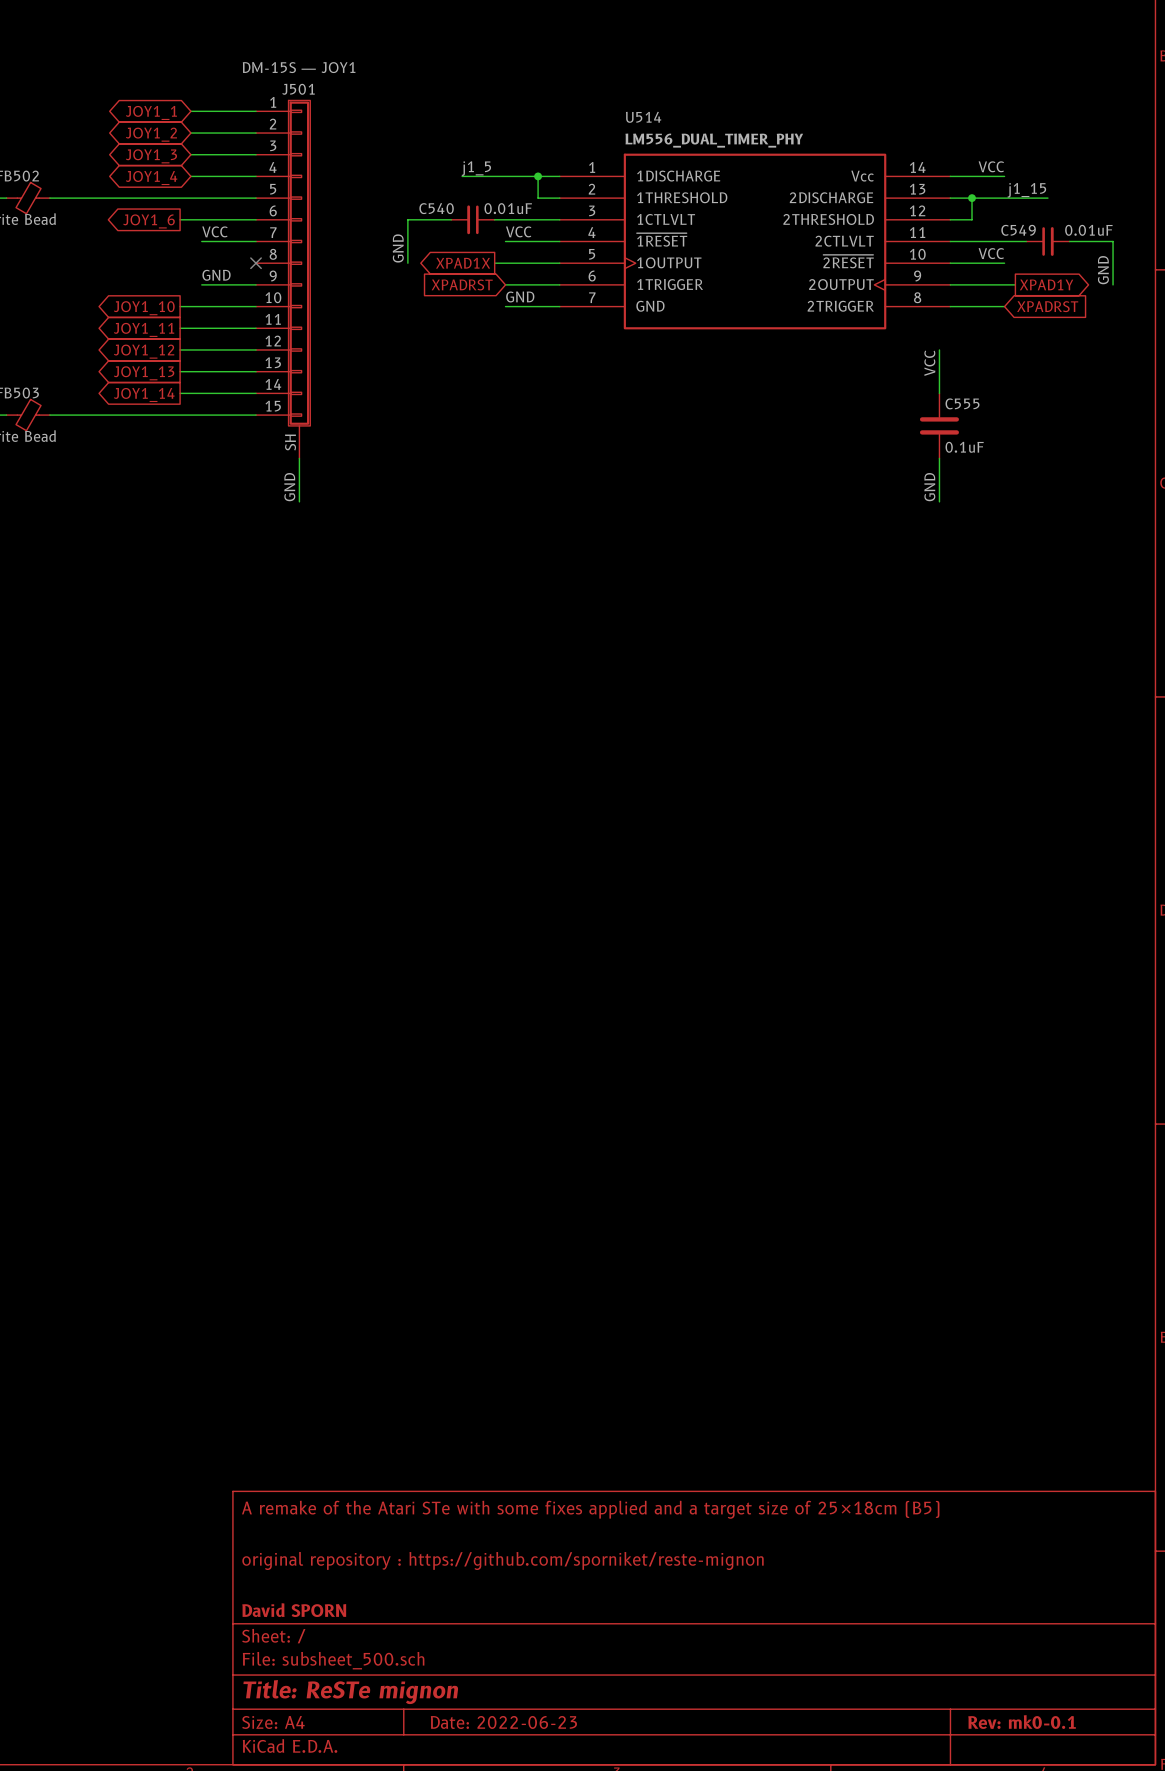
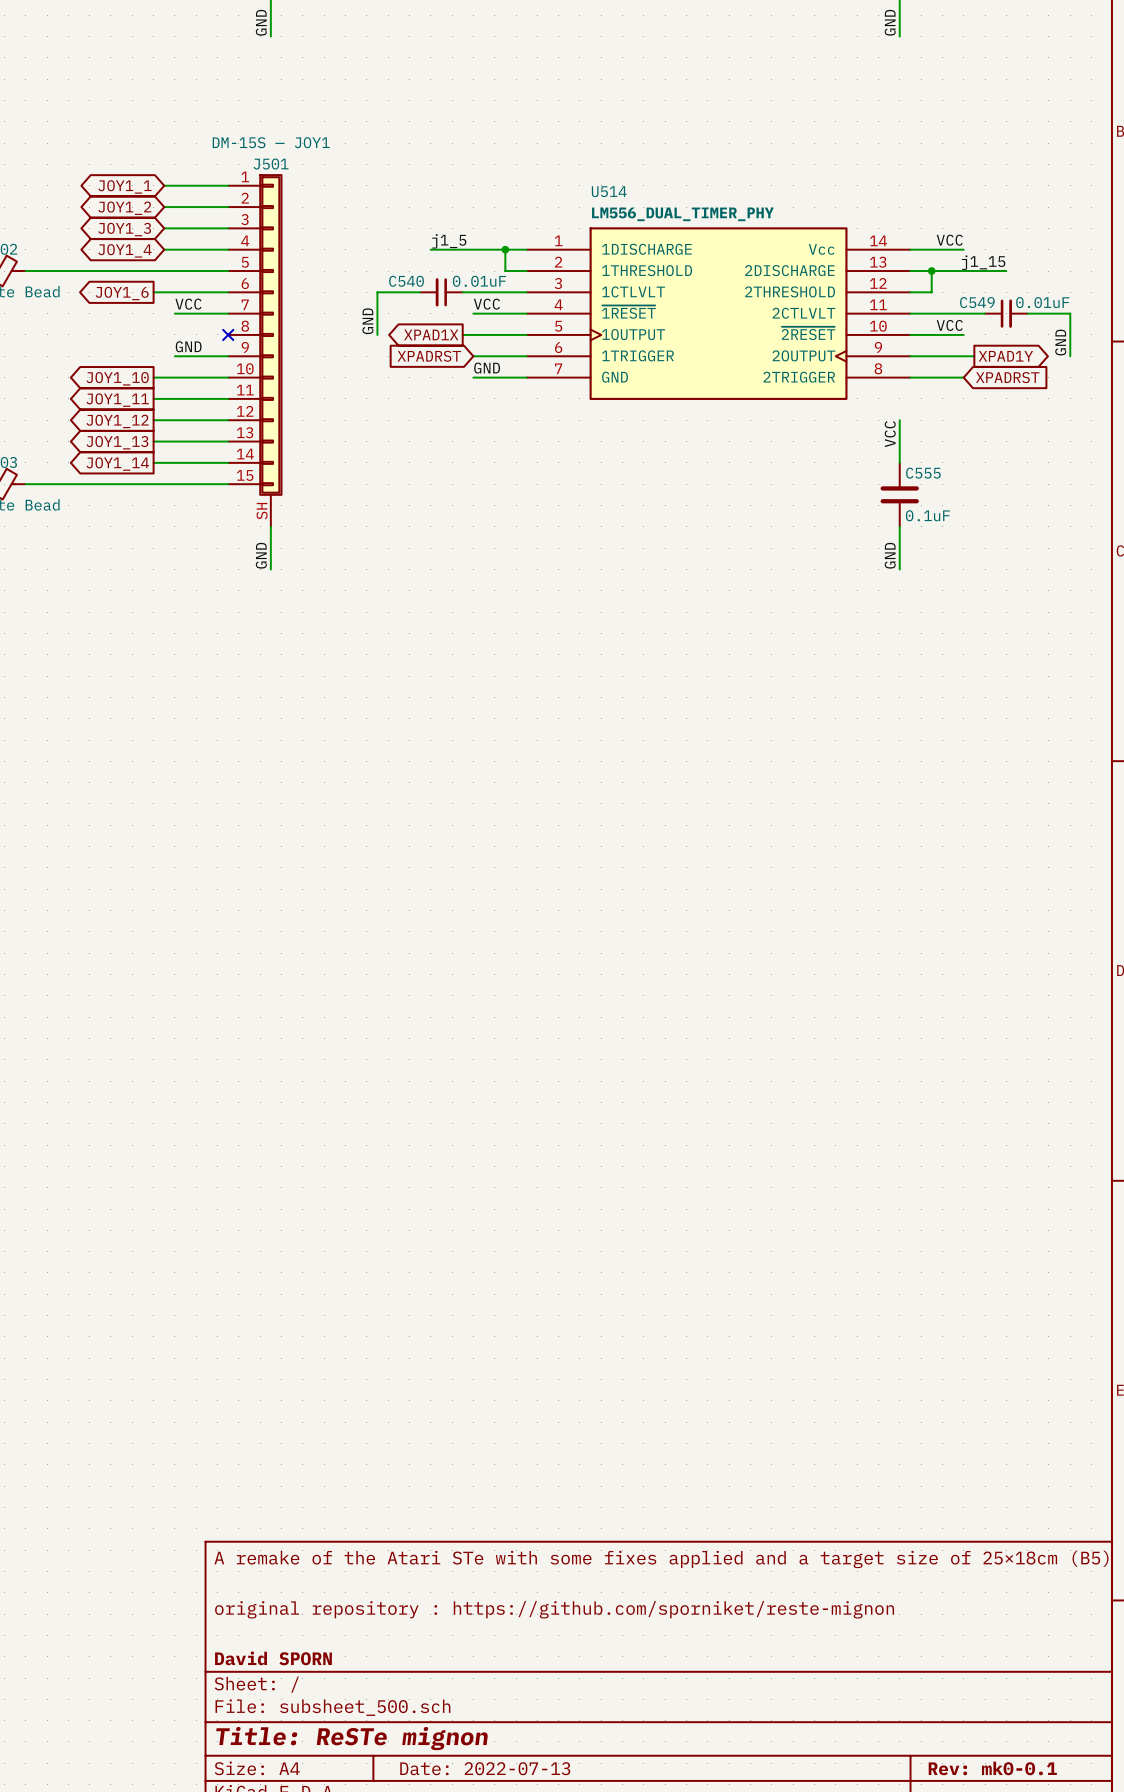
title block: Date: 2022-06-23 (503, 1722) -> Date: 2022-07-13 (485, 1768)

